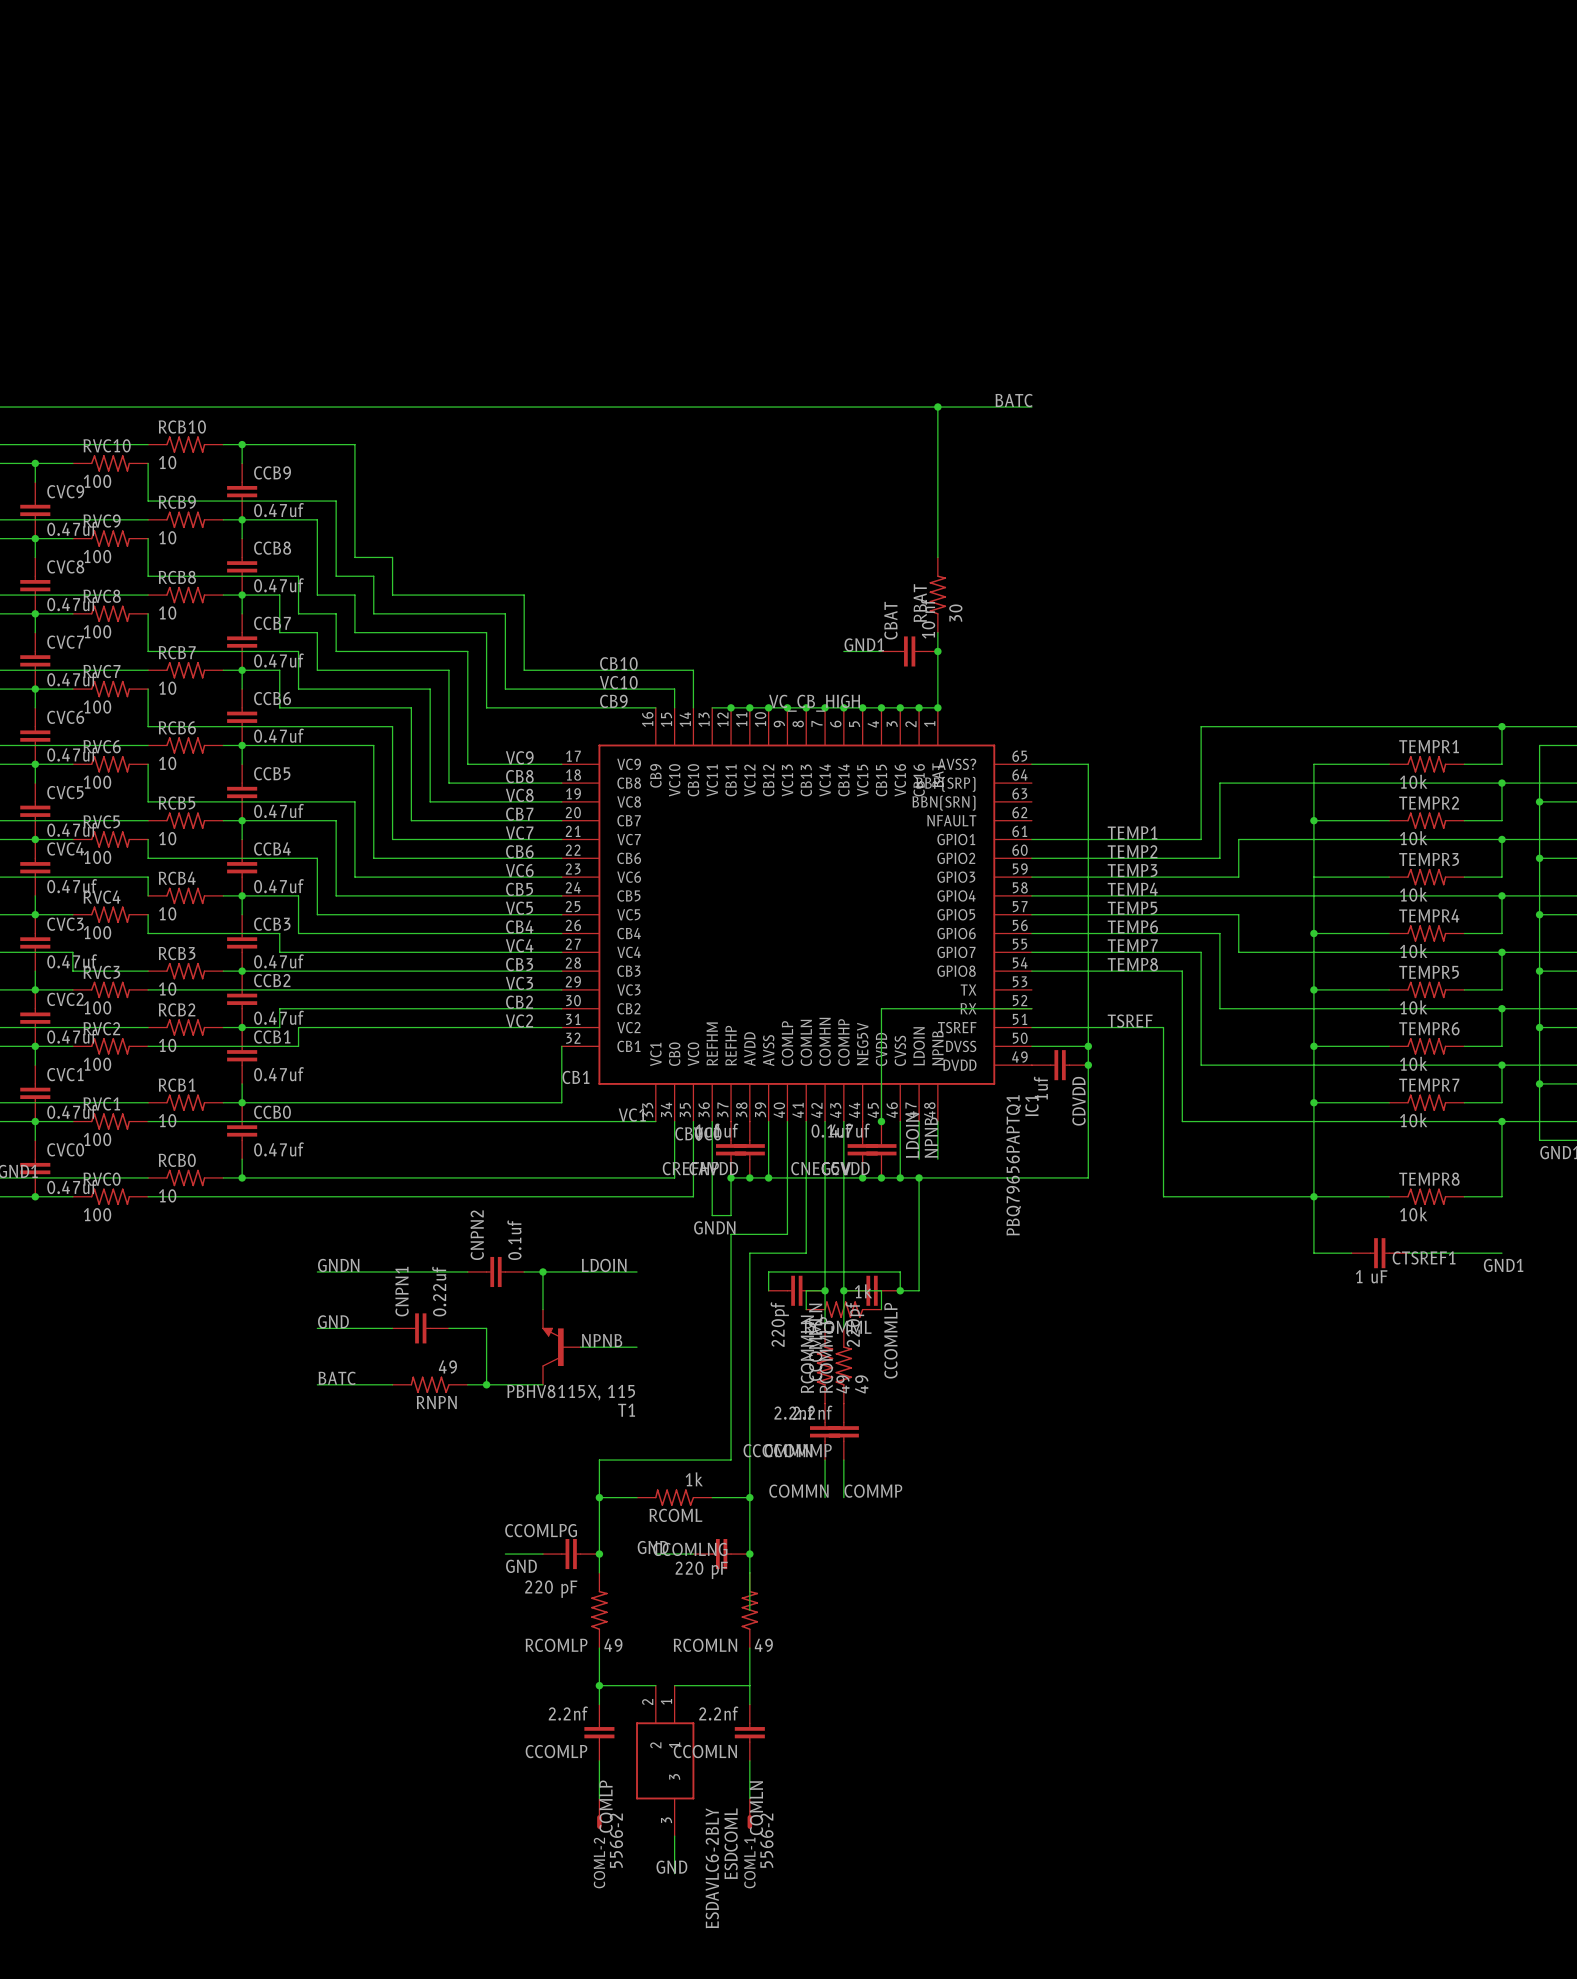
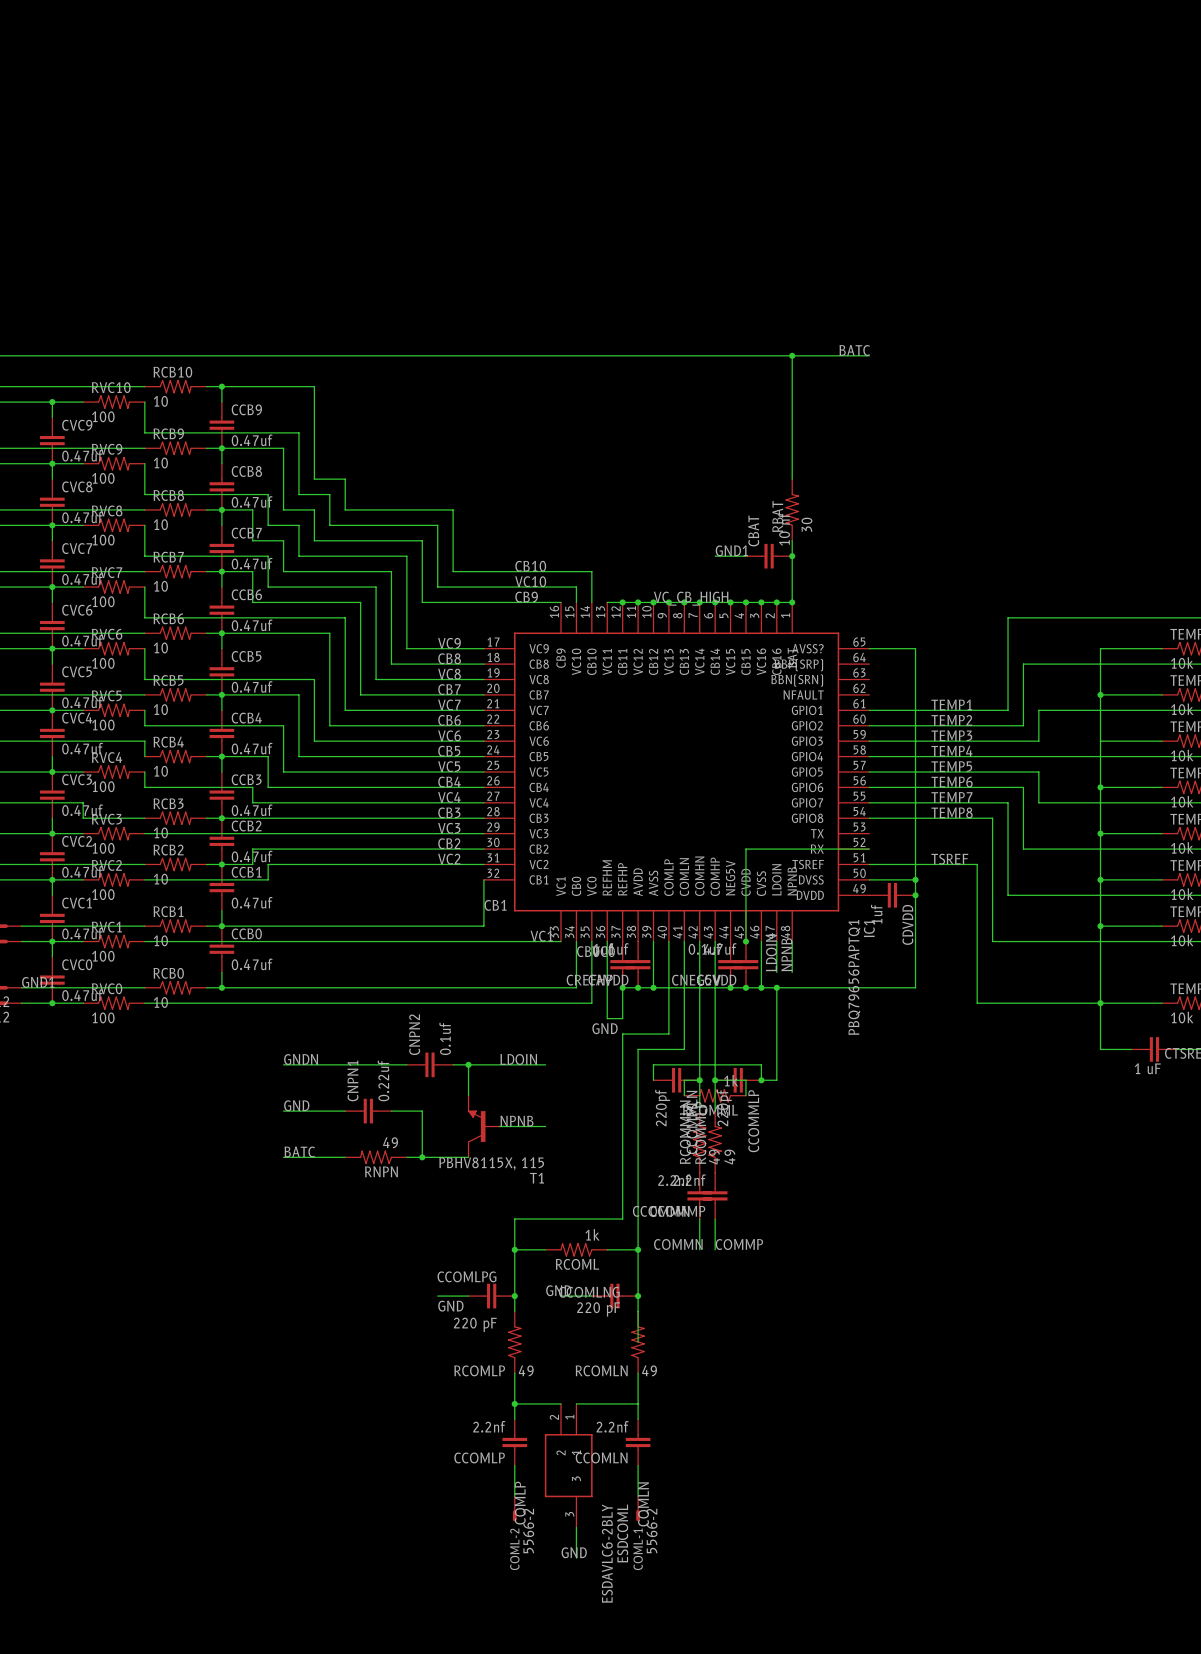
label: GNDN (714, 1227) -> GND (605, 1028)

